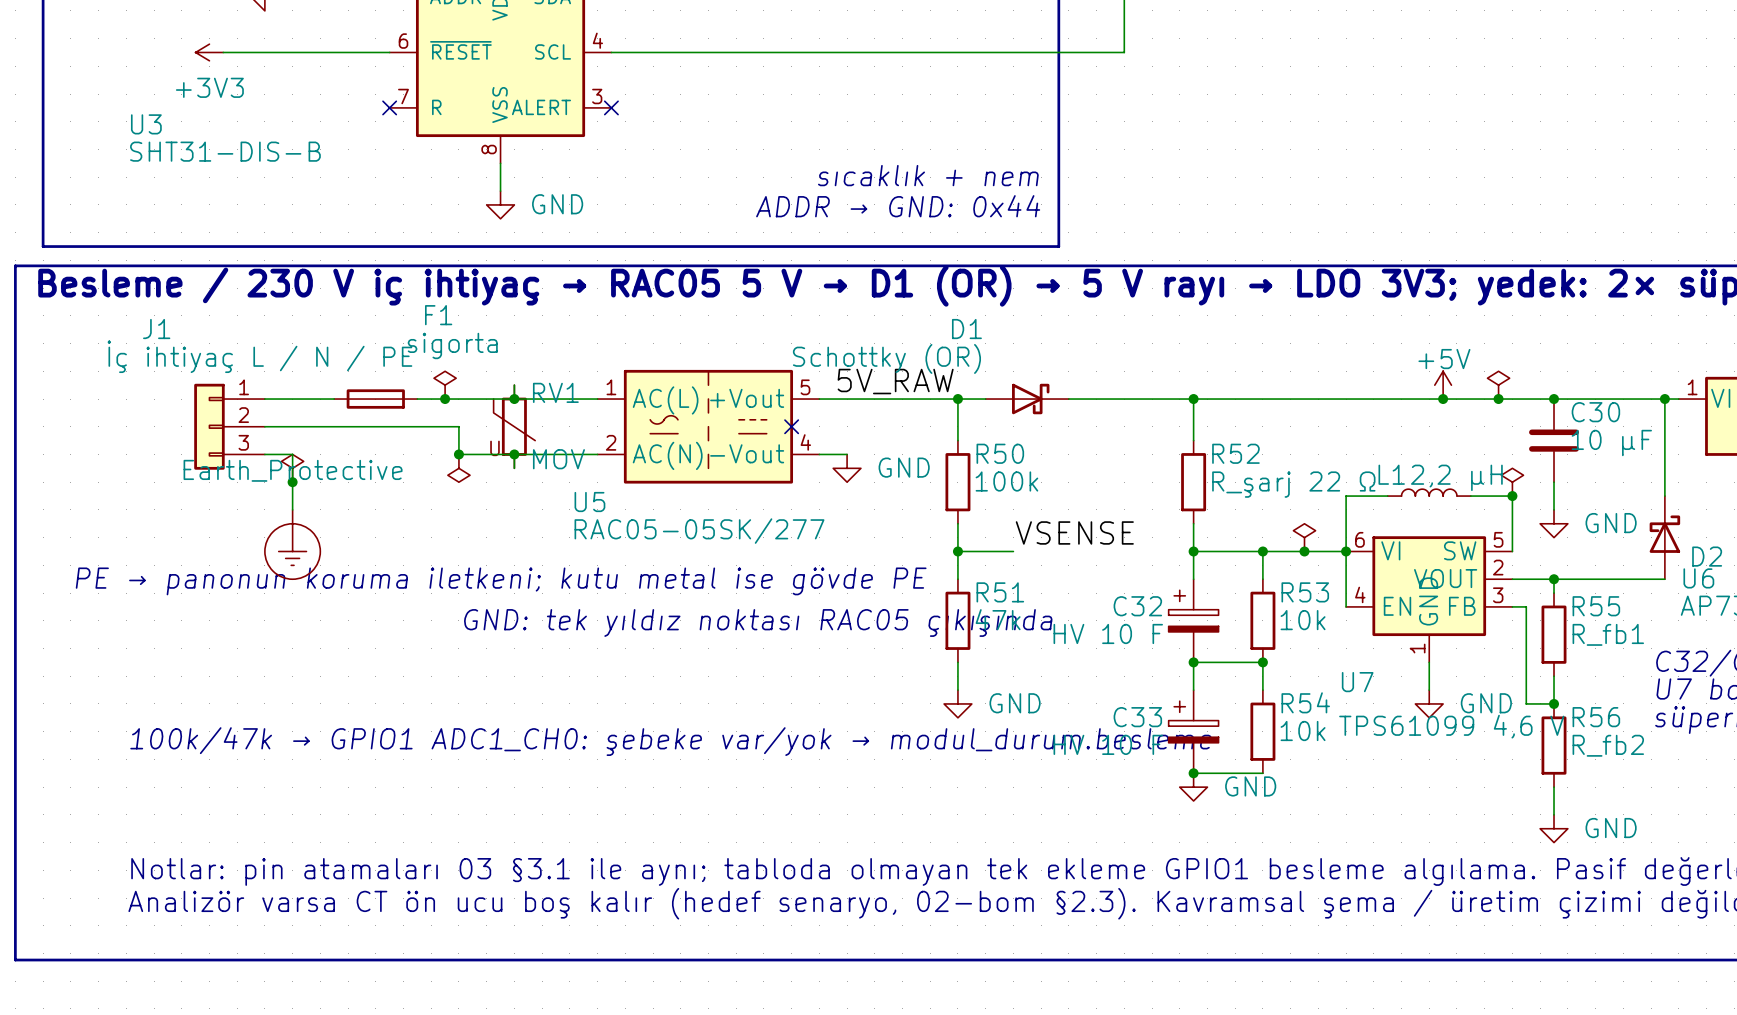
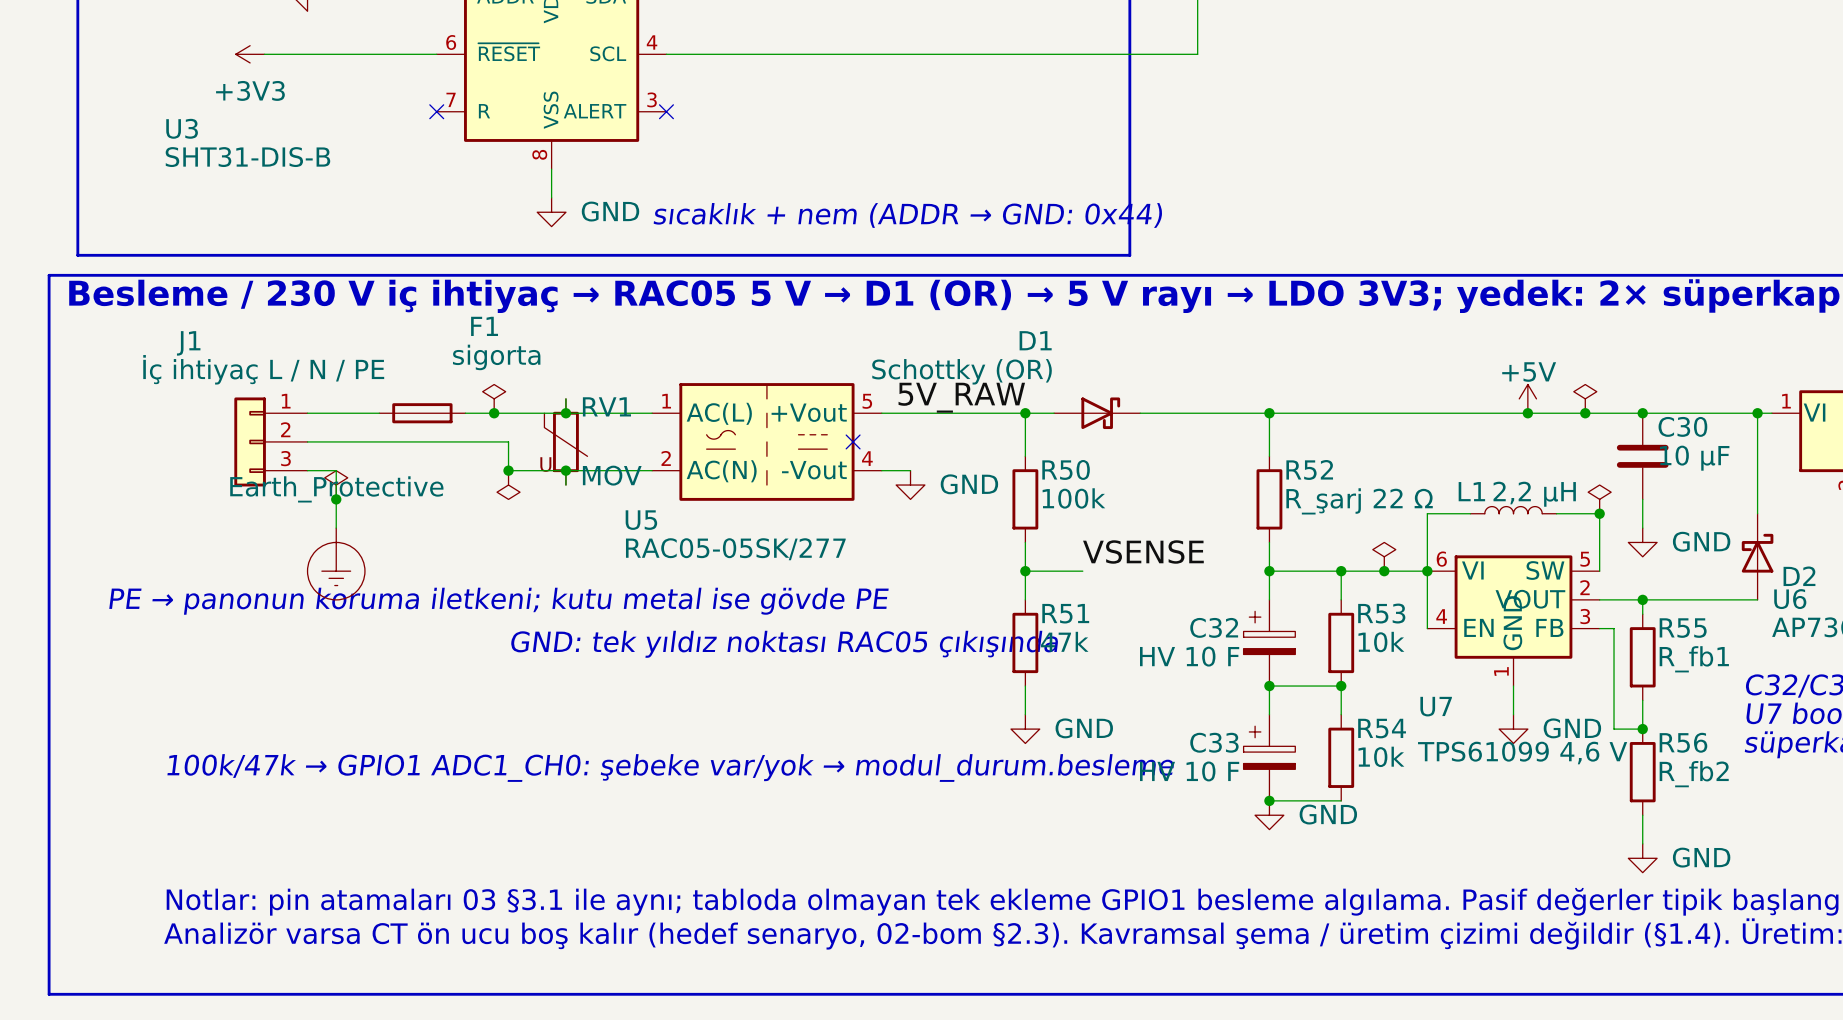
text: sıcaklık + nem (928, 175) -> none
text: ADDR → GND: 0x44 (898, 206) -> none
text: none -> sıcaklık + nem (ADDR → GND: 0x44) (907, 215)

